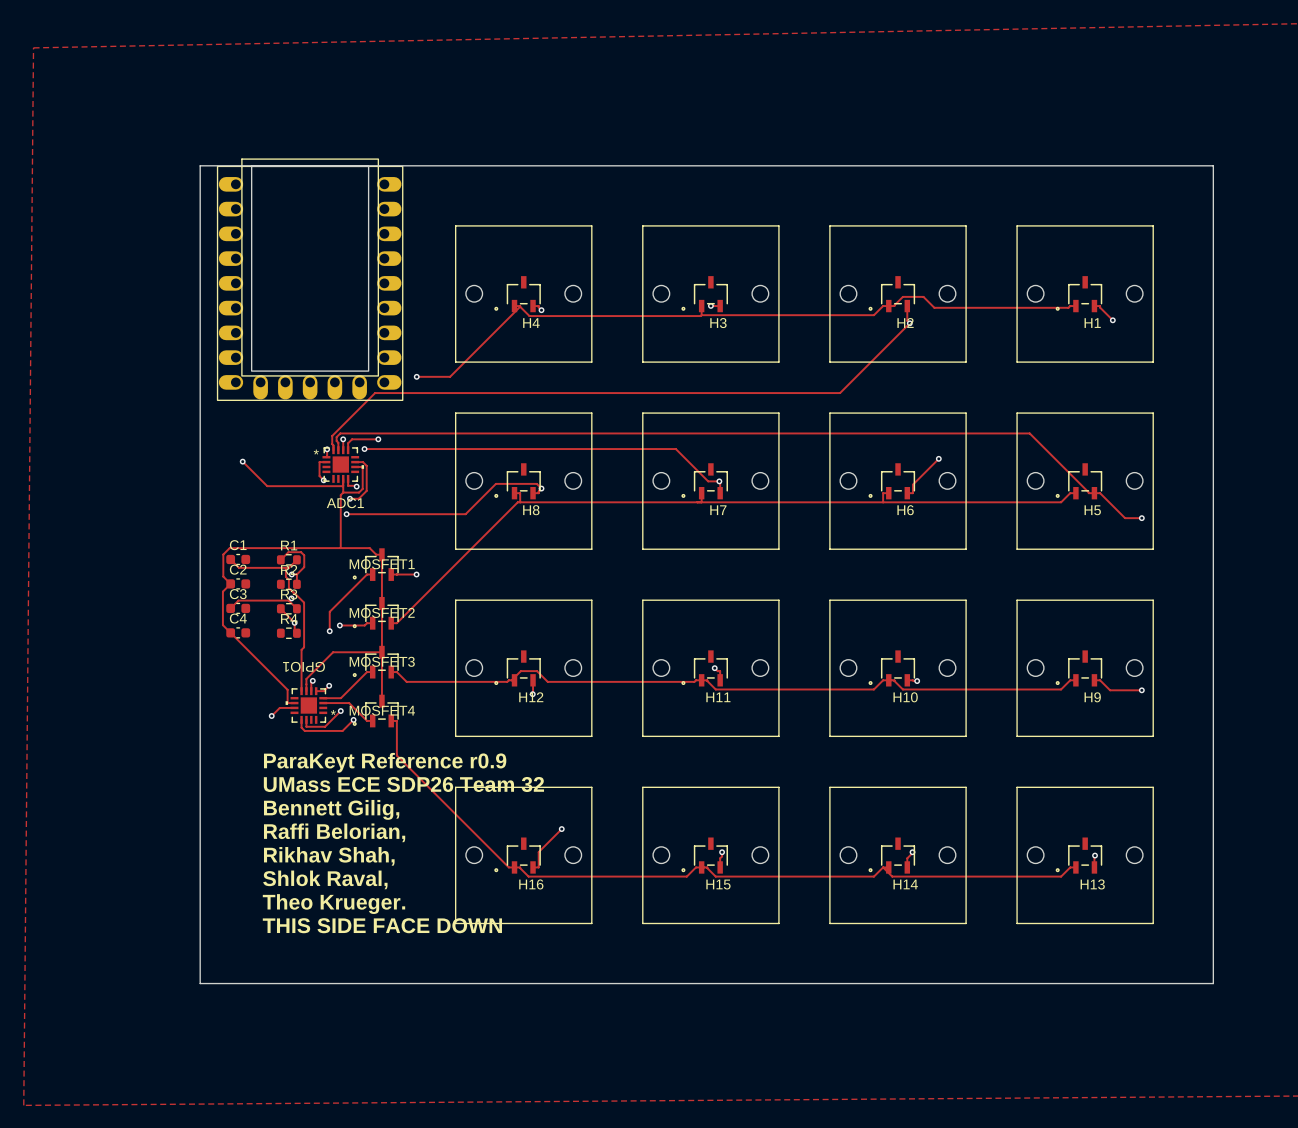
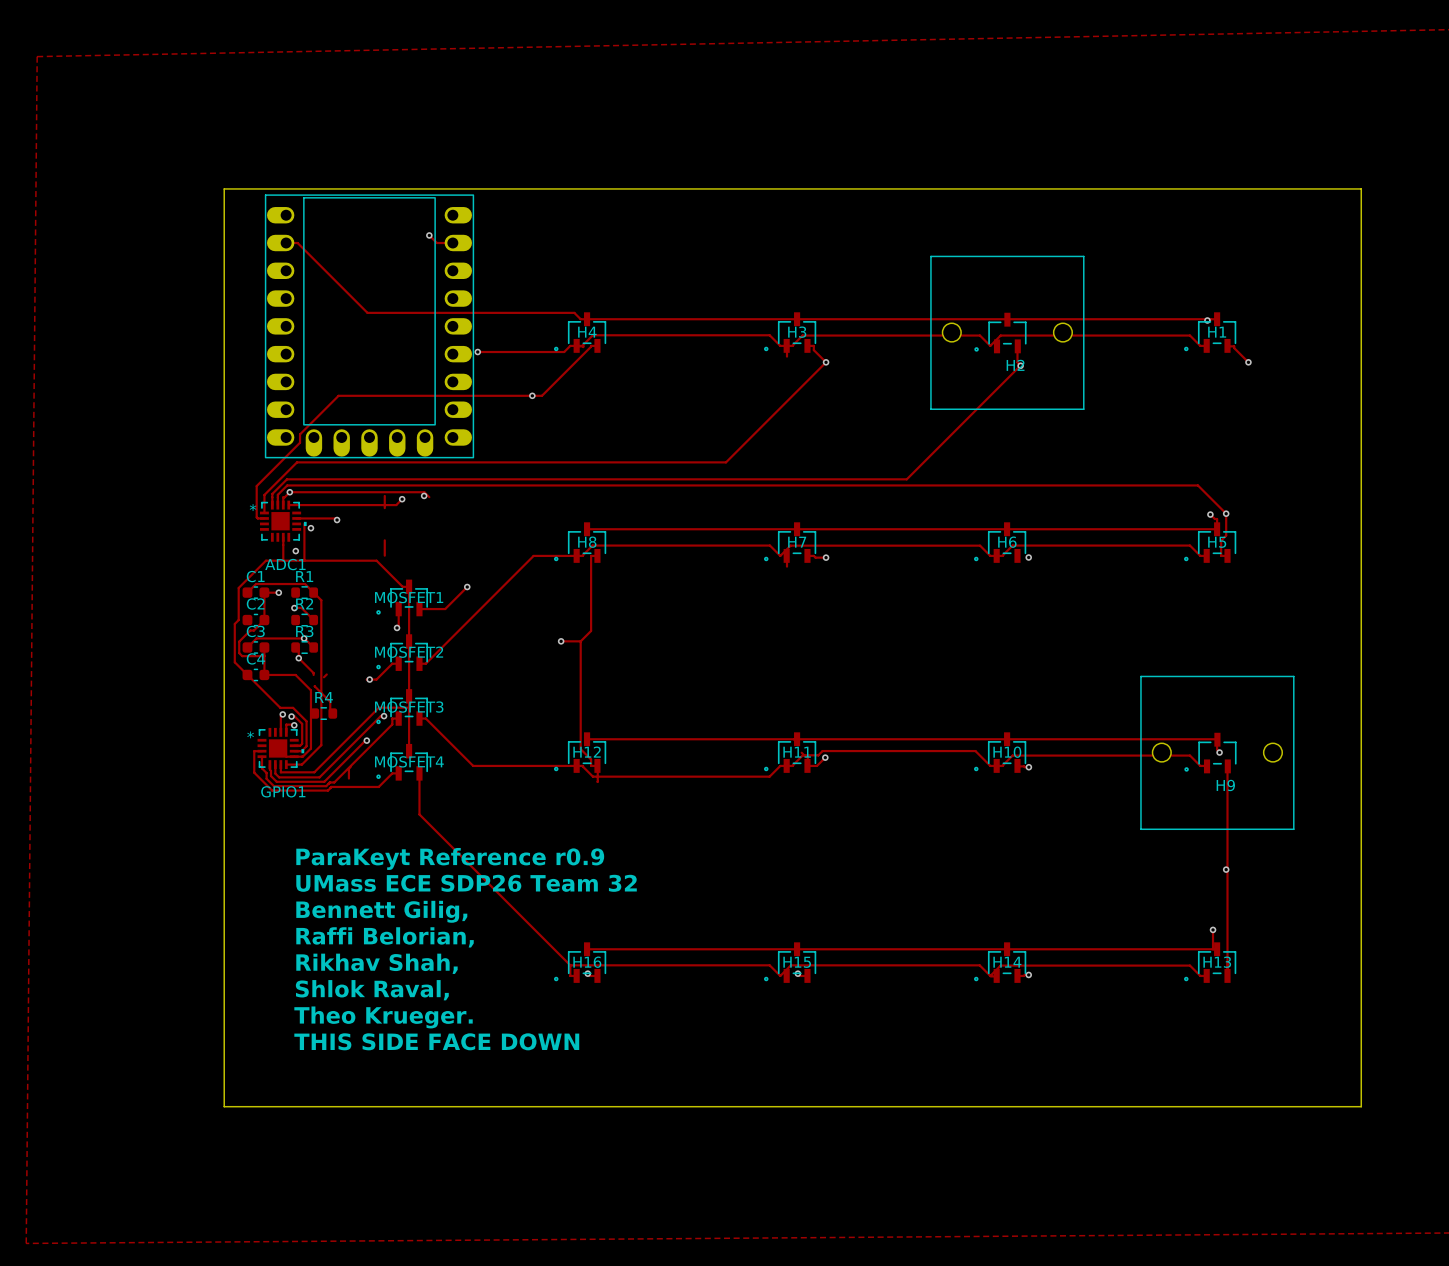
track: none -> (429, 235) (436, 243) (452, 243)
via: none -> (429, 235)
track: none -> (286, 243) (297, 243) (367, 312) (574, 312) (580, 319) (1217, 319)
H4 footprint: [455, 225, 593, 363] -> [554, 312, 607, 353]
H3 footprint: [642, 225, 780, 363] -> [764, 312, 817, 353]
H1 footprint: [1016, 225, 1154, 363] -> [1184, 312, 1237, 353]
part: (310, 279) -> none
via: none -> (1207, 320)
part: none -> (369, 326)
track: none -> (597, 345) (591, 345) (541, 395) (338, 395) (300, 434) (300, 442) (256, 486) (256, 517) (264, 518)
track: (710, 305) (720, 306) -> none
via position: (710, 305) -> (826, 362)
track: none -> (807, 345) (813, 345) (813, 350) (826, 362) (726, 462) (297, 462) (264, 494) (264, 513)
track: none -> (1017, 345) (1017, 362) (1020, 365) (906, 479) (286, 479) (272, 493) (272, 505)
track: none -> (1206, 345) (1200, 345) (1190, 335) (1000, 335) (990, 345) (979, 335) (802, 335) (793, 345) (780, 345) (769, 335) (592, 335) (583, 345) (570, 345) (564, 352) (477, 352)
track: (533, 306) (538, 306) (541, 310) -> none
track: (907, 306) (907, 320) (909, 323) (840, 393) (375, 393) (332, 435) (333, 450) -> none
track: (1075, 306) (1068, 307) (934, 307) (923, 296) (902, 296) (894, 306) (883, 306) (873, 315) (700, 316) (529, 316) (520, 306) (450, 376) (416, 376) -> none
via: (541, 310) -> none
via: none -> (477, 352)
H4 name position: H4 (531, 323) -> H4 (587, 332)
H3 name position: H3 (718, 323) -> H3 (797, 332)
H1 name position: H1 (1092, 323) -> H1 (1217, 332)
via: none -> (532, 395)
via: (416, 376) -> none
H8 footprint: [455, 412, 593, 550] -> [554, 522, 607, 563]
H7 footprint: [642, 412, 780, 550] -> [764, 522, 817, 563]
H6 footprint: [829, 412, 967, 550] -> [974, 522, 1027, 563]
H5 footprint: [1016, 412, 1154, 550] -> [1184, 522, 1237, 563]
via: none -> (289, 492)
via: (343, 439) -> none
track: (378, 439) (352, 439) (348, 443) (348, 450) -> none
track: none -> (429, 497) (424, 492) (289, 492) (283, 497) (283, 505)
track: none -> (402, 499) (396, 505) (288, 505)
via: none -> (402, 499)
track: none -> (277, 505) (277, 494) (287, 485) (1197, 485) (1226, 513) (1226, 535) (1221, 540) (1221, 555) (1227, 555)
track: (327, 449) (326, 457) -> none
via: (327, 449) -> none
track: (364, 449) (675, 449) (708, 481) (719, 481) (720, 493) -> none
via: (364, 449) -> none
track: (338, 450) (336, 437) (340, 433) (1029, 433) (1088, 493) (1100, 493) (1125, 518) (1141, 518) -> none
track: none -> (1210, 514) (1217, 519) (1217, 529) (587, 529)
via: none -> (1210, 514)
via: none -> (1226, 513)
track: (938, 458) (912, 484) (912, 493) (907, 493) -> none
via position: (938, 458) -> (1028, 557)
track: none -> (296, 518) (337, 520)
via: none -> (337, 520)
track: (242, 461) (267, 486) (343, 485) -> none
via: (242, 461) -> none
track: (326, 462) (319, 462) (319, 476) (323, 480) -> none
track: (355, 462) (362, 462) (366, 465) (366, 490) (358, 498) (349, 498) -> none
track: none -> (304, 523) (304, 560)
ADC1 position: (343, 464) -> (283, 521)
track: (355, 466) (362, 467) (362, 488) (359, 492) (343, 492) (340, 495) (340, 548) -> none
via: none -> (310, 528)
track: none -> (283, 537) (283, 560)
track: (348, 478) (348, 485) (356, 486) -> none
via: (323, 480) -> none
via position: (719, 481) -> (826, 557)
via: (356, 486) -> none
via: none -> (295, 551)
via: (541, 488) -> none
track: none -> (597, 555) (591, 555) (591, 630) (580, 641)
track: none -> (807, 555) (826, 557)
track: none -> (1206, 555) (1200, 555) (1190, 545) (1012, 545) (1003, 555) (990, 555) (980, 545) (790, 545) (780, 555) (769, 545) (592, 545) (583, 555) (533, 555) (425, 663) (419, 663)
track: (514, 493) (520, 493) (520, 502) -> none
track: (533, 493) (538, 493) (541, 488) (536, 483) (495, 483) (465, 514) (346, 514) -> none
track: (888, 493) (883, 493) (883, 502) -> none
track: (1075, 493) (1070, 493) (1061, 502) (517, 502) (396, 623) (391, 623) -> none
via: (349, 498) -> none
H8 name position: H8 (531, 510) -> H8 (587, 542)
H7 name position: H7 (718, 510) -> H7 (797, 542)
H6 name position: H6 (905, 510) -> H6 (1007, 542)
H5 name position: H5 (1092, 510) -> H5 (1217, 542)
via: (346, 514) -> none
via: (1141, 518) -> none
track: none -> (467, 587) (445, 609) (419, 609)
via: none -> (467, 587)
track: none -> (247, 592) (256, 584) (305, 584) (321, 600) (321, 745) (301, 764) (286, 764)
track: none -> (264, 592) (264, 620) (239, 641) (239, 653) (242, 656) (264, 656)
track: none -> (264, 592) (278, 592)
via: none -> (278, 592)
track: none -> (294, 608) (301, 607) (313, 620)
via: none -> (294, 608)
track: none -> (398, 609) (398, 626) (397, 627)
via: none -> (397, 627)
track: (230, 559) (239, 567) (288, 567) (296, 559) -> none
C1 position: (238, 559) -> (255, 592)
track: (280, 559) (288, 552) (301, 552) (304, 555) (304, 567) (296, 574) -> none
R1 position: (288, 559) -> (304, 592)
MOSFET1 position: (375, 564) -> (402, 597)
via: none -> (304, 638)
track: (285, 567) (288, 588) (304, 602) (301, 691) -> none
track: none -> (561, 641) (580, 641)
via: none -> (561, 641)
track: none -> (580, 641) (580, 749) (591, 759) (591, 765) (597, 765)
track: none -> (247, 647) (256, 638) (304, 638) (313, 647)
track: none -> (264, 647) (264, 674) (295, 674) (310, 690) (310, 748) (302, 756) (286, 756) (278, 748)
track: none -> (295, 647) (298, 650) (298, 658) (313, 674)
via: (291, 574) -> none
track: (296, 574) (296, 584) -> none
track: (372, 574) (367, 574) (329, 611) (329, 631) -> none
track: (391, 574) (416, 574) -> none
via: (416, 574) -> none
C2 position: (238, 583) -> (255, 620)
via: none -> (298, 658)
R2 position: (288, 584) -> (304, 620)
track: none -> (398, 663) (392, 663) (376, 679) (366, 679)
via: (291, 598) -> none
H12 footprint: [455, 599, 593, 737] -> [554, 732, 607, 773]
H11 footprint: [642, 599, 780, 737] -> [764, 732, 817, 773]
H10 footprint: [829, 599, 967, 737] -> [974, 732, 1027, 773]
via: none -> (369, 679)
track: (230, 608) (238, 600) (288, 600) (296, 608) -> none
C3 position: (238, 608) -> (255, 647)
R3 position: (288, 608) -> (304, 647)
MOSFET2 position: (375, 613) -> (402, 652)
via: (294, 622) -> none
track: (372, 623) (367, 623) (364, 625) (339, 625) -> none
via: (339, 625) -> none
track: none -> (409, 707) (378, 707) (314, 772) (280, 772) (280, 764)
via: (329, 631) -> none
C4 position: (238, 632) -> (255, 674)
track: none -> (282, 714) (280, 716) (280, 732)
via: none -> (282, 714)
track: none -> (291, 716) (294, 716) (302, 723) (302, 743) (294, 745)
via: none -> (291, 716)
track: none -> (384, 716) (380, 716) (319, 777) (279, 777) (275, 773) (275, 764)
via: none -> (384, 716)
track: none -> (398, 718) (392, 718) (392, 724) (334, 782) (329, 782) (326, 786) (273, 786) (266, 778) (266, 772) (262, 768) (262, 756)
track: none -> (419, 718) (425, 718) (473, 765) (583, 765) (592, 776) (769, 776) (780, 765) (793, 765) (802, 755) (818, 755) (822, 751) (975, 751) (990, 765) (1003, 765) (1012, 755) (1190, 755) (1200, 765) (1206, 765)
track: none -> (294, 725) (286, 724) (286, 732)
via: none -> (294, 725)
track: (381, 652) (333, 652) (306, 678) (306, 691) -> none
track: none -> (587, 739) (1217, 739) (1217, 749) (1219, 752)
track: none -> (366, 740) (324, 781) (276, 781) (270, 776) (269, 764)
via: none -> (366, 740)
MOSFET3 position: (375, 662) -> (402, 707)
track: none -> (262, 751) (254, 751) (254, 772) (272, 790) (327, 790) (331, 786) (378, 786) (392, 773) (398, 773)
track: none -> (294, 751) (301, 751) (306, 746) (306, 721) (293, 707) (280, 707) (234, 662) (234, 623) (238, 620) (238, 587) (265, 560) (376, 560) (402, 586) (409, 586) (409, 751)
via: none -> (1219, 752)
via position: (714, 668) -> (825, 757)
track: (372, 672) (367, 672) (340, 698) (323, 698) -> none
track: (391, 672) (396, 672) (406, 681) (514, 680) -> none
track: none -> (825, 757) (817, 765) (807, 765)
track: none -> (1227, 765) (1227, 975)
via: (312, 680) -> none
track: (511, 680) (520, 671) (537, 671) (547, 681) (707, 680) (715, 689) (873, 689) (883, 680) (894, 680) (902, 689) (1061, 689) (1070, 680) (1075, 680) -> none
track: (1094, 680) (1100, 680) (1110, 690) (1141, 690) -> none
track: (329, 685) (323, 691) (316, 691) -> none
via: (329, 685) -> none
track: none -> (419, 773) (419, 814) (570, 965)
via: (1141, 690) -> none
via: (532, 694) -> none
H12 name position: H12 (531, 697) -> H12 (587, 752)
H11 name position: H11 (718, 697) -> H11 (797, 752)
H10 name position: H10 (905, 697) -> H10 (1007, 752)
track: (381, 701) (381, 554) (376, 554) (369, 548) (229, 548) (223, 554) (223, 576) (230, 583) (222, 591) (222, 625) (287, 689) (287, 703) (294, 703) -> none
track: (323, 703) (349, 703) (367, 720) (372, 720) -> none
GPIO1 rotation: 0° (306, 705) -> 180° (280, 748)
GPIO1 position: (306, 705) -> (280, 748)
track: (294, 707) (279, 707) (271, 716) -> none
track: (340, 711) (325, 726) (306, 726) (306, 719) -> none
via: (340, 711) -> none
MOSFET4 position: (375, 711) -> (402, 762)
via: (271, 716) -> none
track: (301, 719) (301, 727) (304, 730) (342, 730) (353, 719) -> none
via: (353, 719) -> none
track: (391, 720) (396, 720) (396, 755) (508, 867) (520, 867) (528, 876) (686, 876) (695, 867) (707, 867) (715, 876) (873, 876) (883, 867) (892, 876) (1061, 876) (1070, 867) (1075, 867) -> none
via: none -> (1226, 869)
H16 footprint: [455, 786, 593, 925] -> [554, 942, 607, 983]
H15 footprint: [642, 786, 780, 925] -> [764, 942, 817, 983]
H14 footprint: [829, 786, 967, 925] -> [974, 942, 1027, 983]
H13 footprint: [1016, 786, 1154, 925] -> [1184, 942, 1237, 983]
track: none -> (1213, 929) (1213, 949)
track: (561, 829) (538, 852) (538, 867) (533, 867) -> none
via position: (561, 829) -> (587, 973)
track: none -> (587, 949) (1217, 949)
track: (722, 852) (720, 867) -> none
via position: (722, 852) -> (797, 973)
track: (912, 852) (907, 858) (907, 867) -> none
via position: (912, 852) -> (1028, 974)
via position: (1095, 855) -> (1213, 929)
track: none -> (570, 965) (570, 975) (576, 975)
track: none -> (570, 965) (769, 965) (780, 975) (790, 965) (979, 965) (990, 975) (1000, 965) (1190, 965) (1200, 975) (1206, 975)
track: none -> (587, 973) (590, 975) (597, 975)
track: none -> (797, 973) (800, 975) (807, 975)
track: none -> (1028, 974) (1017, 975)
H16 name position: H16 (531, 884) -> H16 (587, 962)
H15 name position: H15 (718, 884) -> H15 (797, 962)
H14 name position: H14 (905, 884) -> H14 (1007, 962)
H13 name position: H13 (1092, 884) -> H13 (1217, 962)

